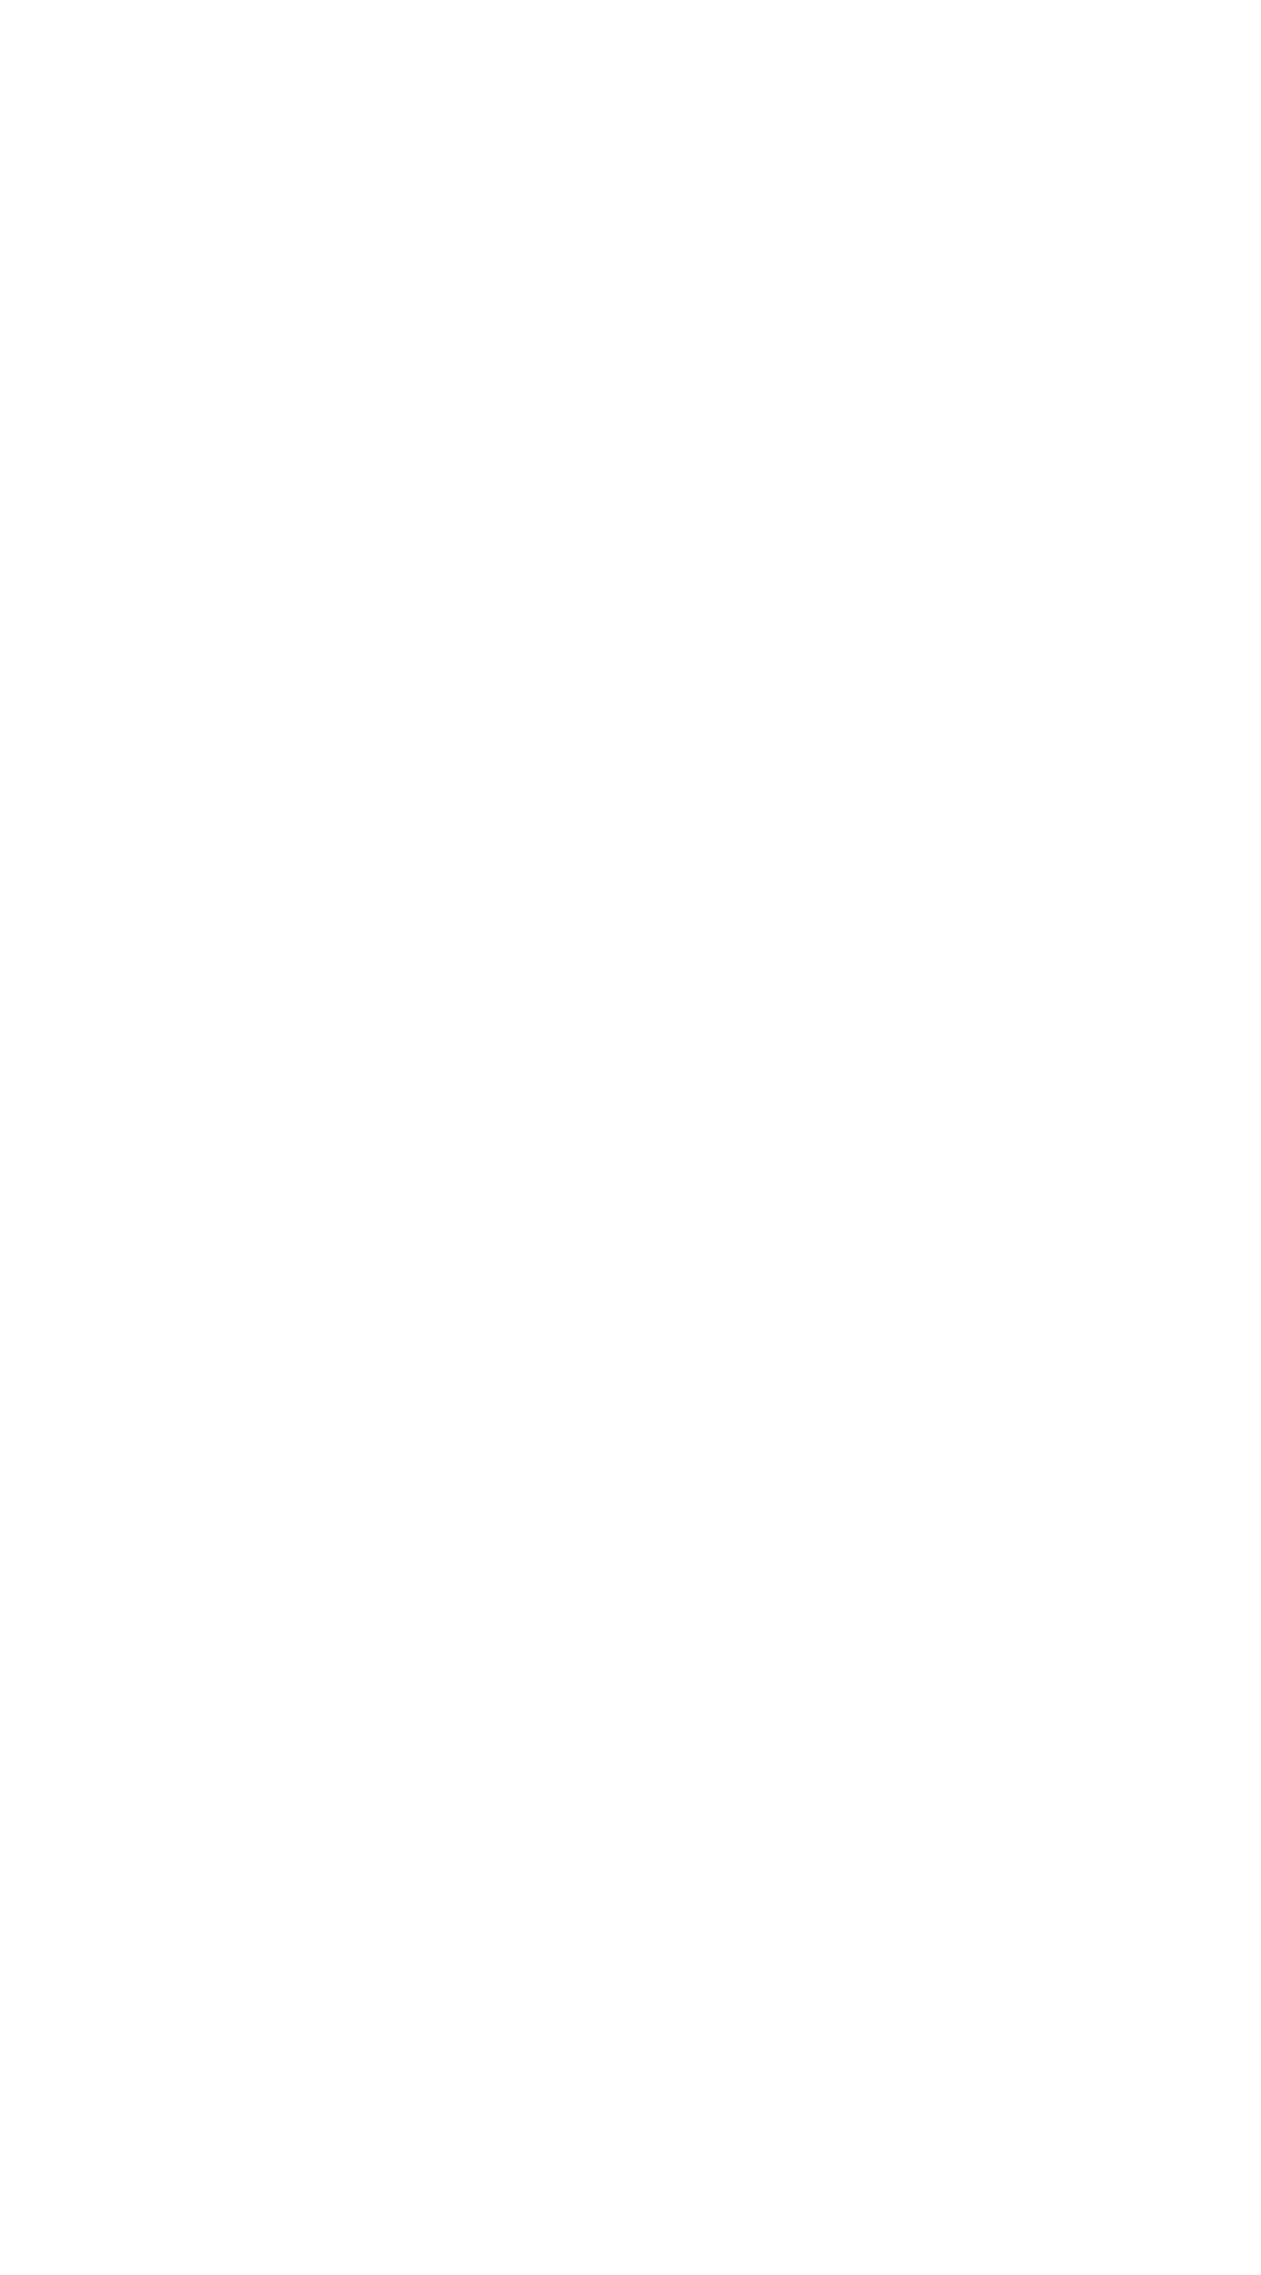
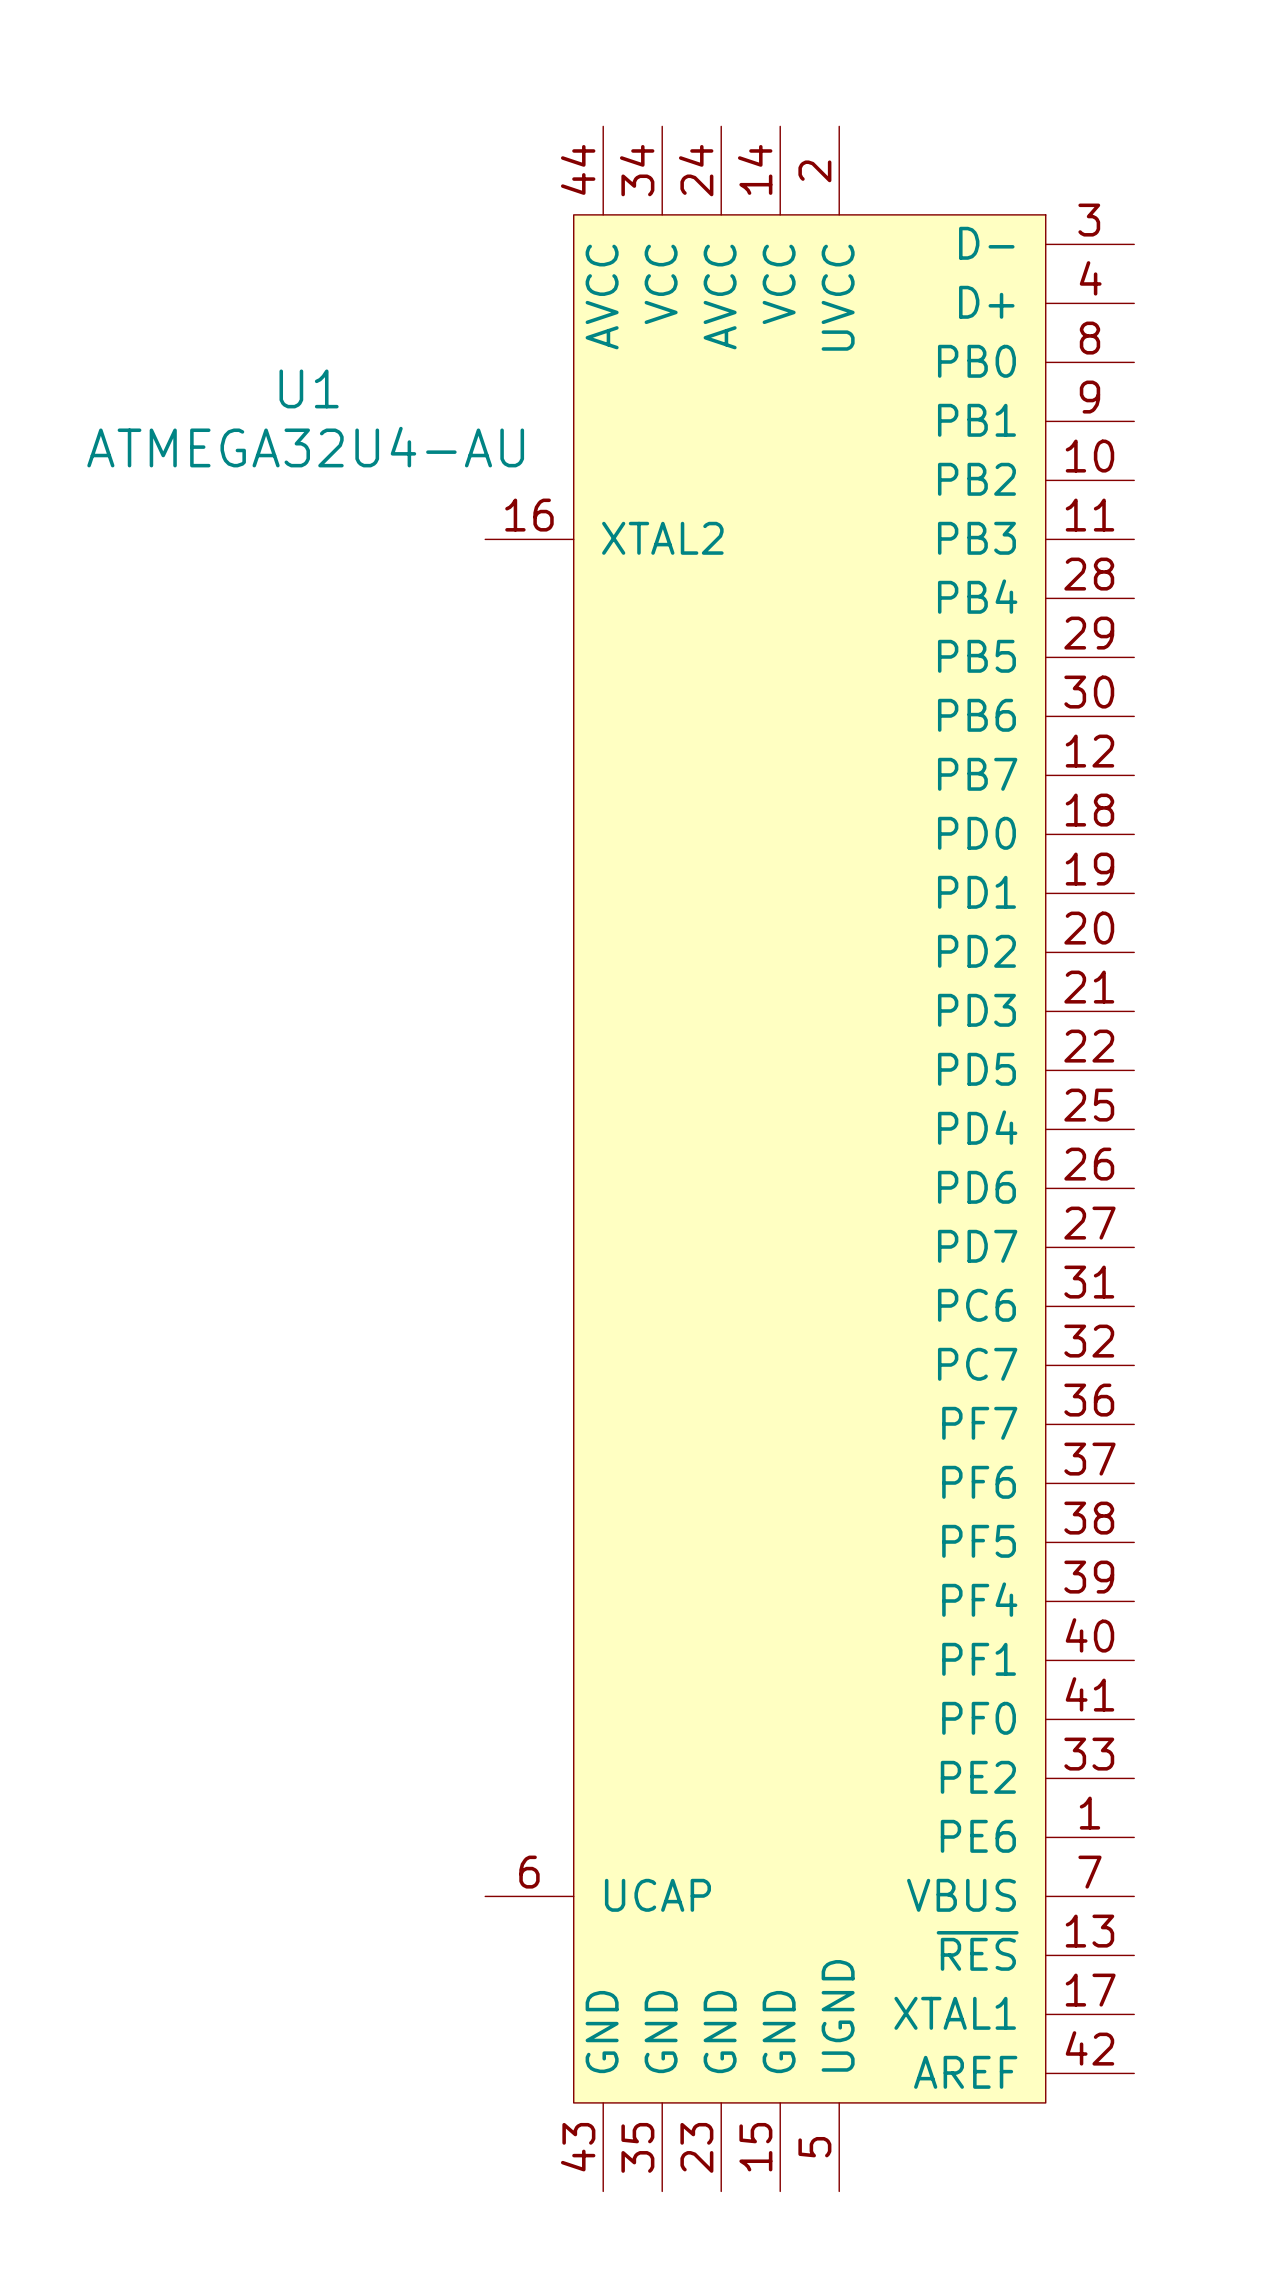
U1: none -> ATMEGA32U4-AU (809, 1158)

